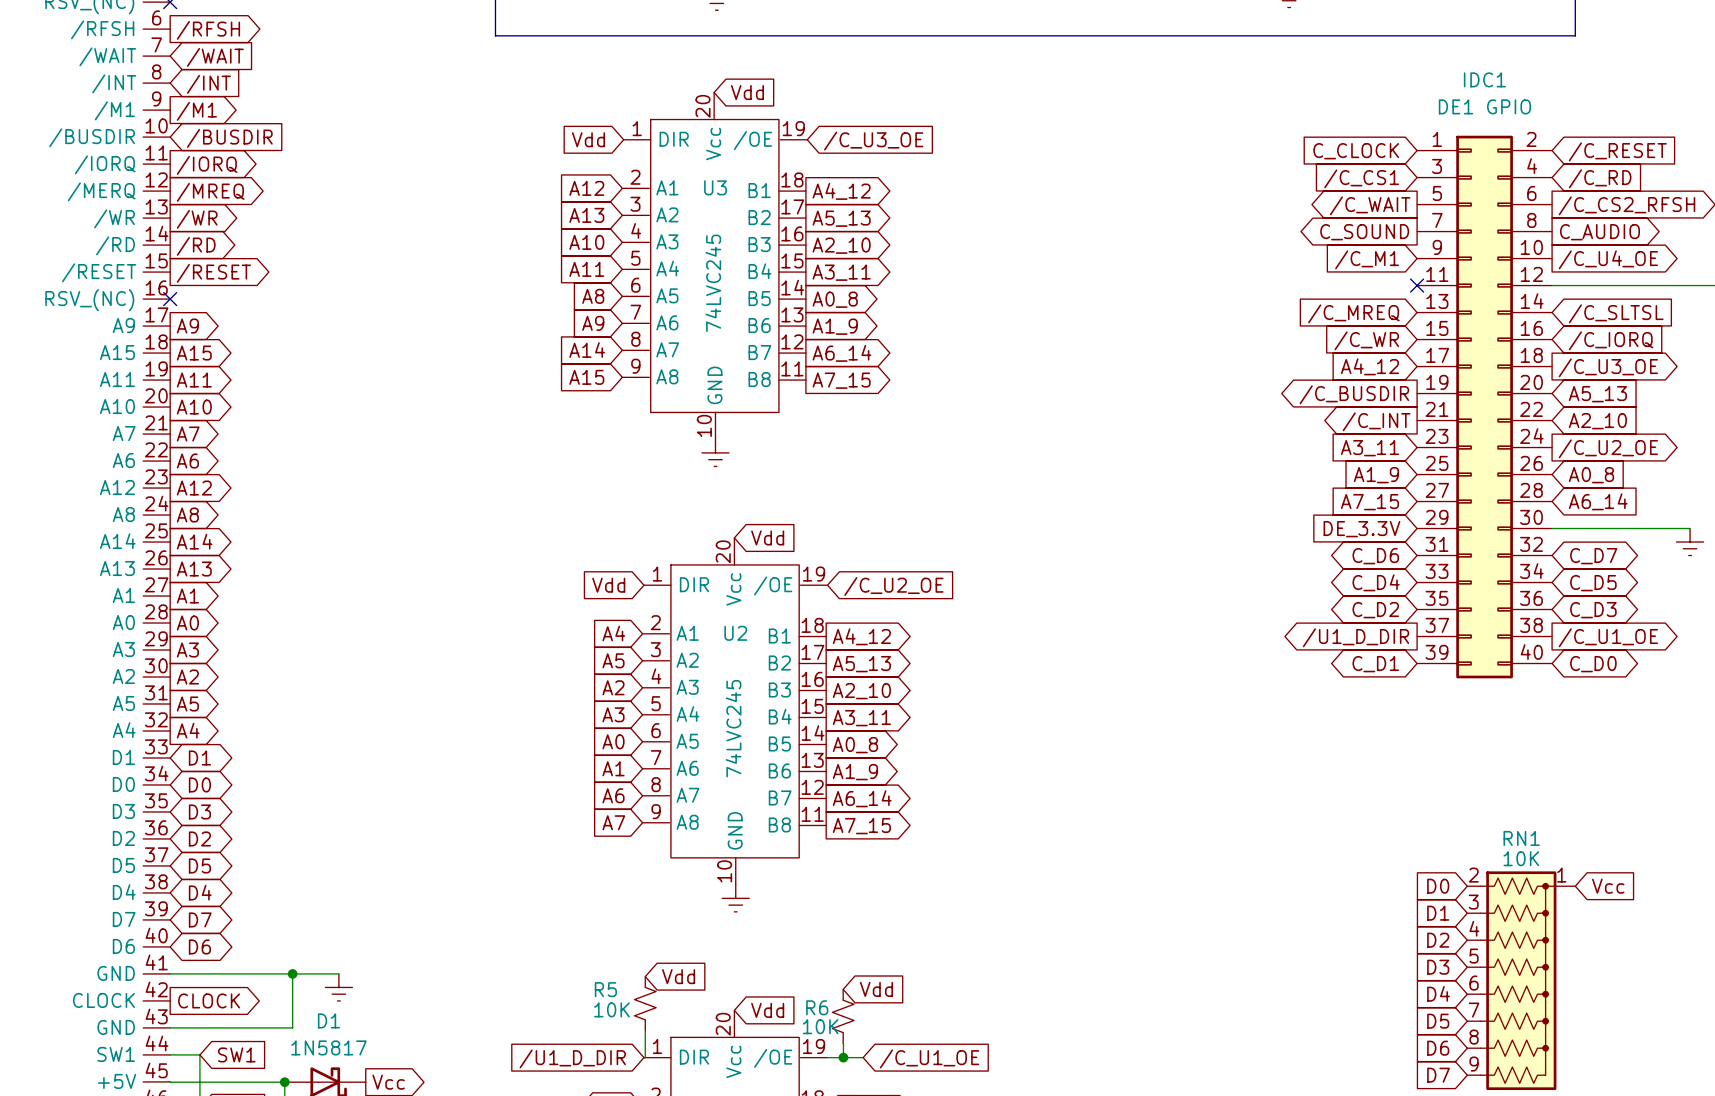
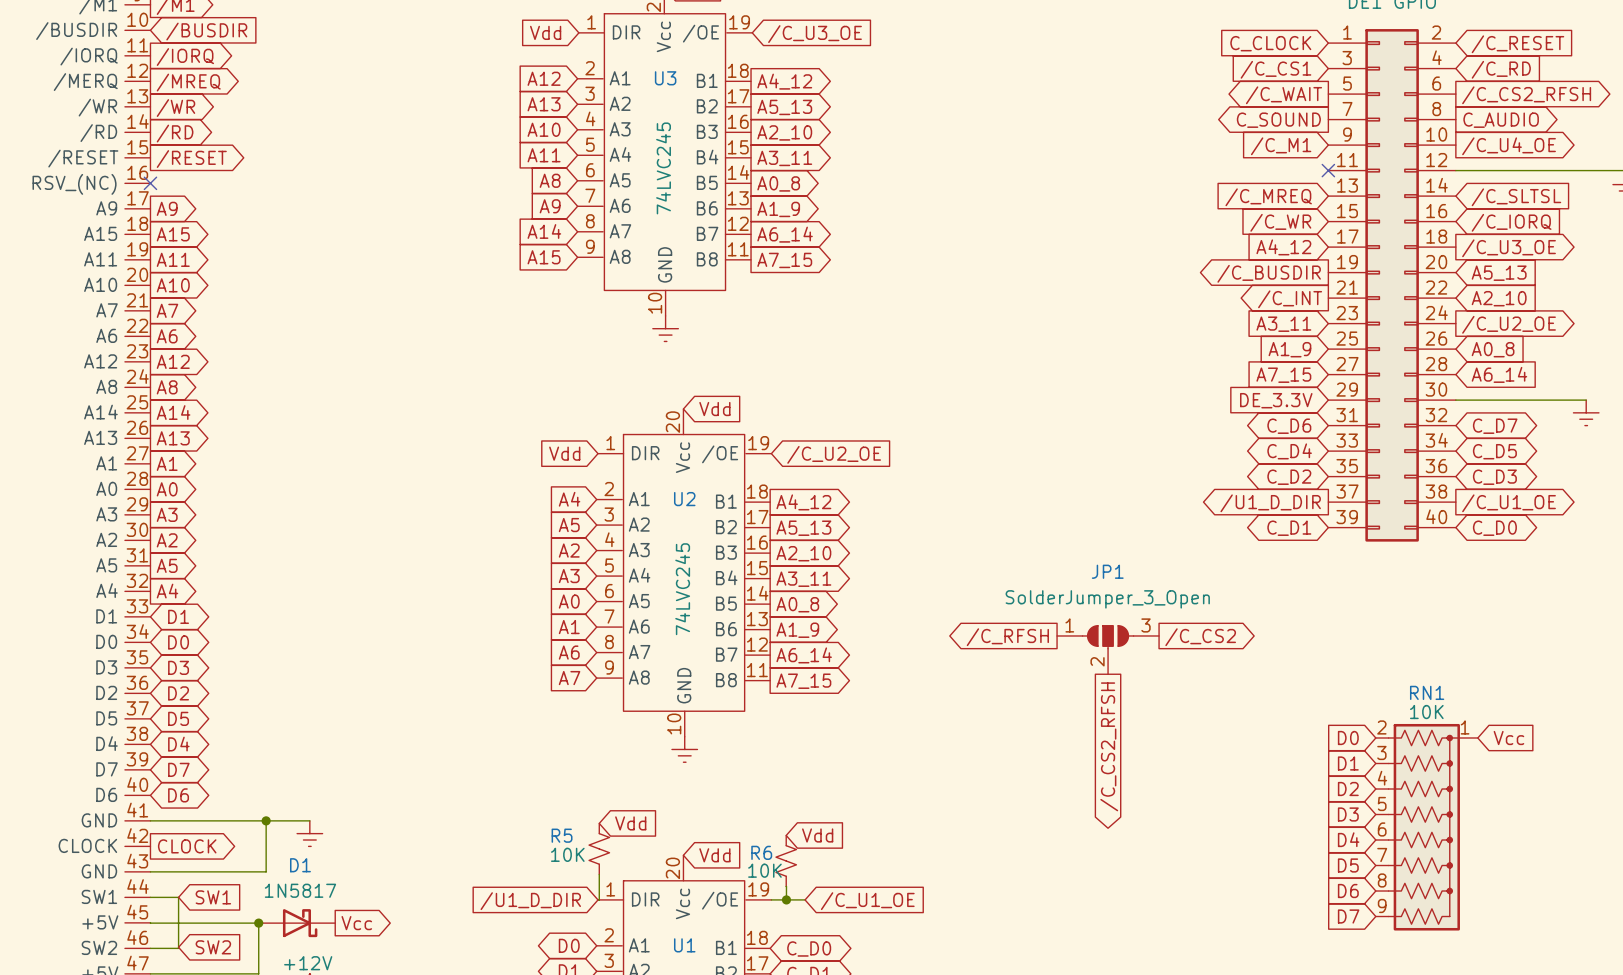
global label: none -> /C_RFSH (1007, 637)
global label: none -> /C_CS2 (1200, 637)
JP1: none -> SolderJumper_3_Open (1108, 649)
global label: none -> /C_CS2_RFSH (1109, 746)

